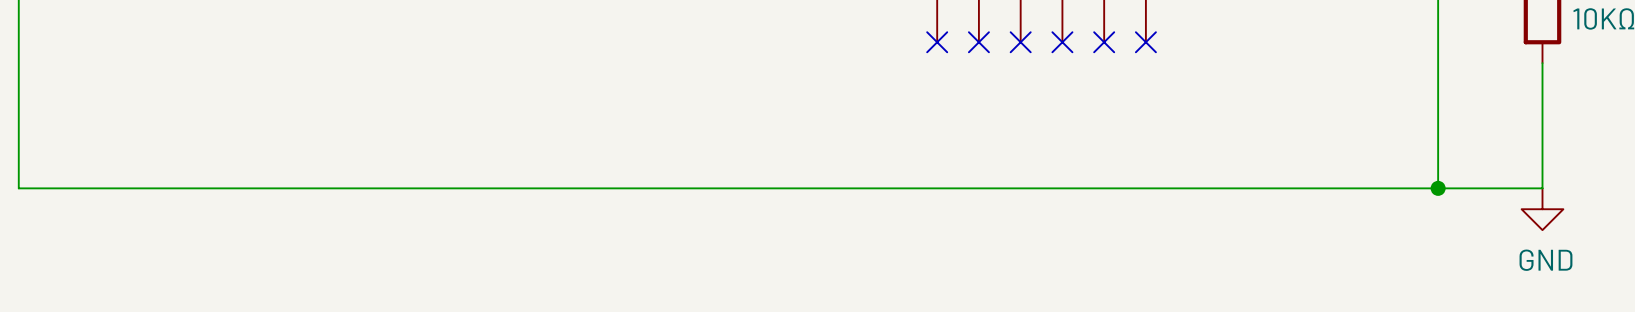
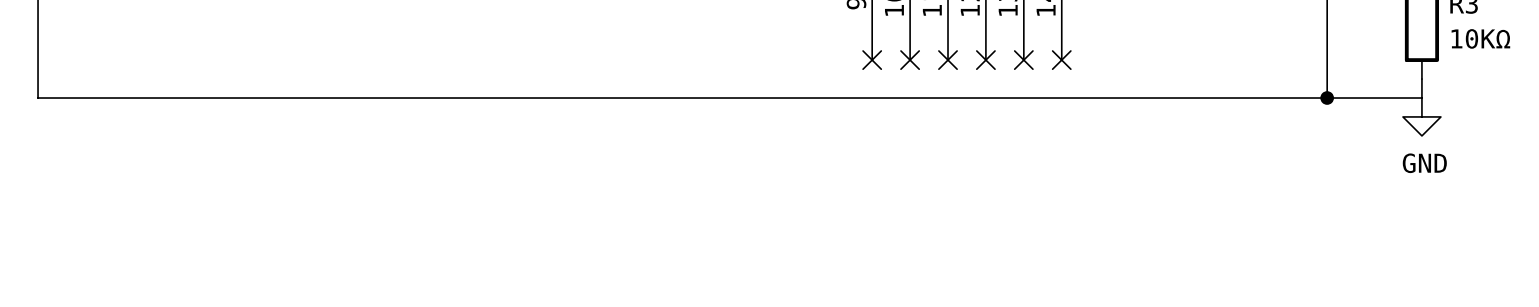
wire: (18, 83) (18, 188) (1542, 188) (1542, 83) -> (38, 98) (1421, 98)
wire: (1438, 83) (1438, 188) -> none
junction: none -> (1327, 98)
junction: (1438, 188) -> none
power symbol position: GND (1542, 209) -> GND (1421, 116)

